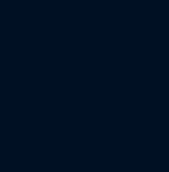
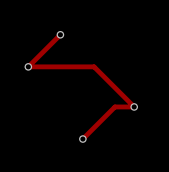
track: none -> (60, 34) (28, 66) (94, 66) (134, 106) (114, 106) (82, 139)
via: none -> (60, 34)
via: none -> (28, 66)
via: none -> (134, 106)
via: none -> (82, 139)

